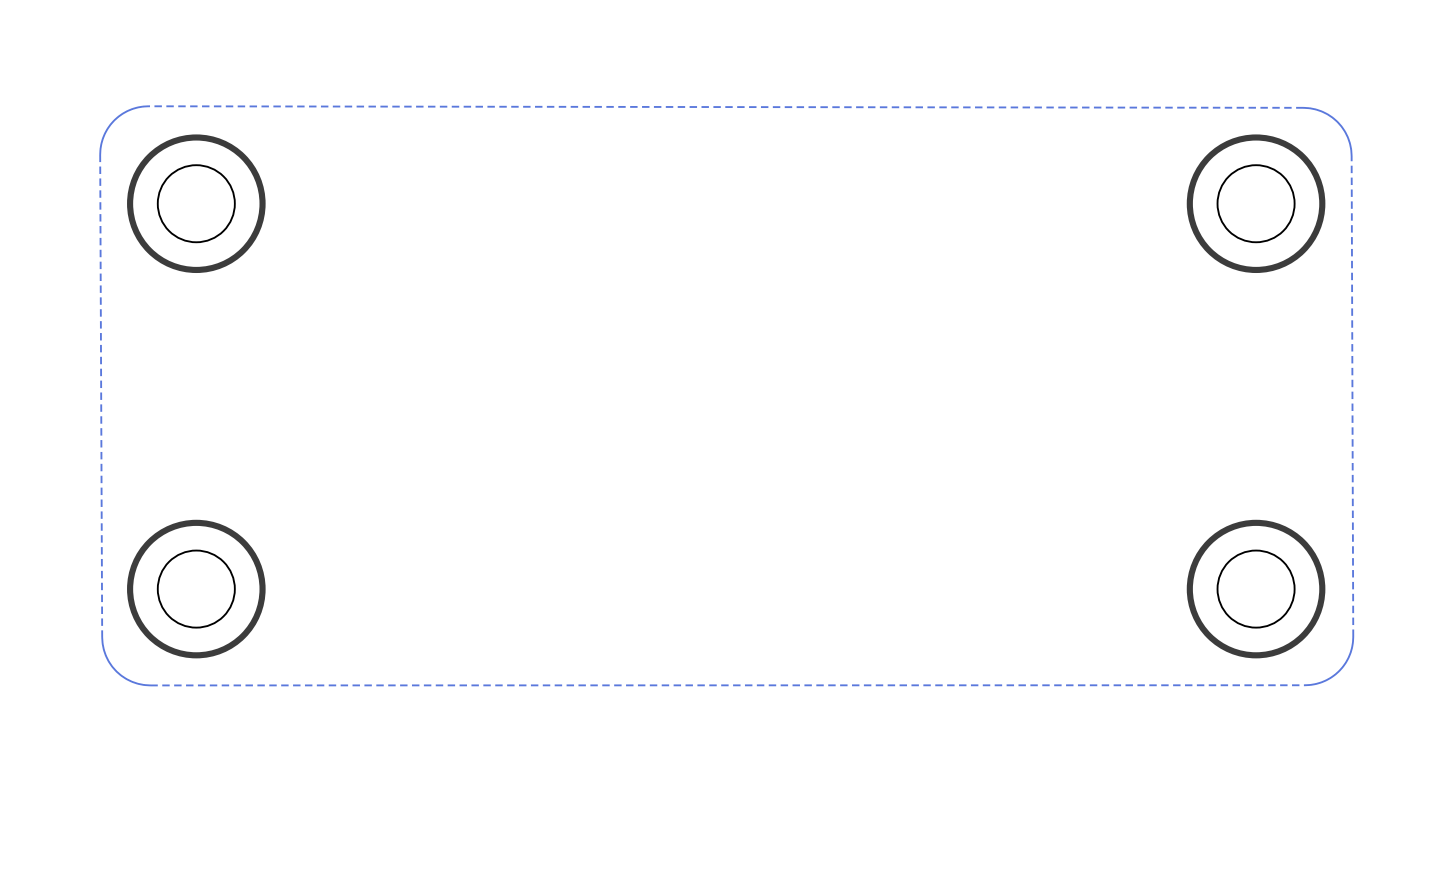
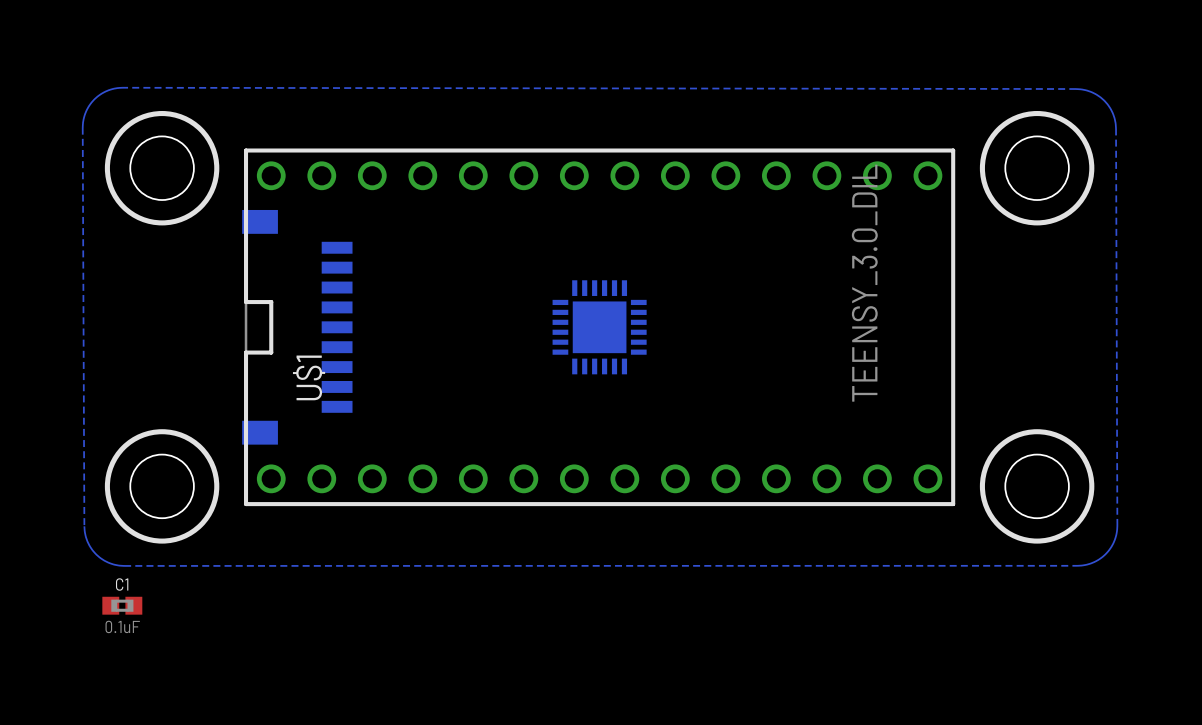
part: none -> (297, 327)
part: none -> (599, 327)
U$1: none -> TEENSY_3.0_DIL (599, 327)
C1: none -> 0.1uF (122, 605)

